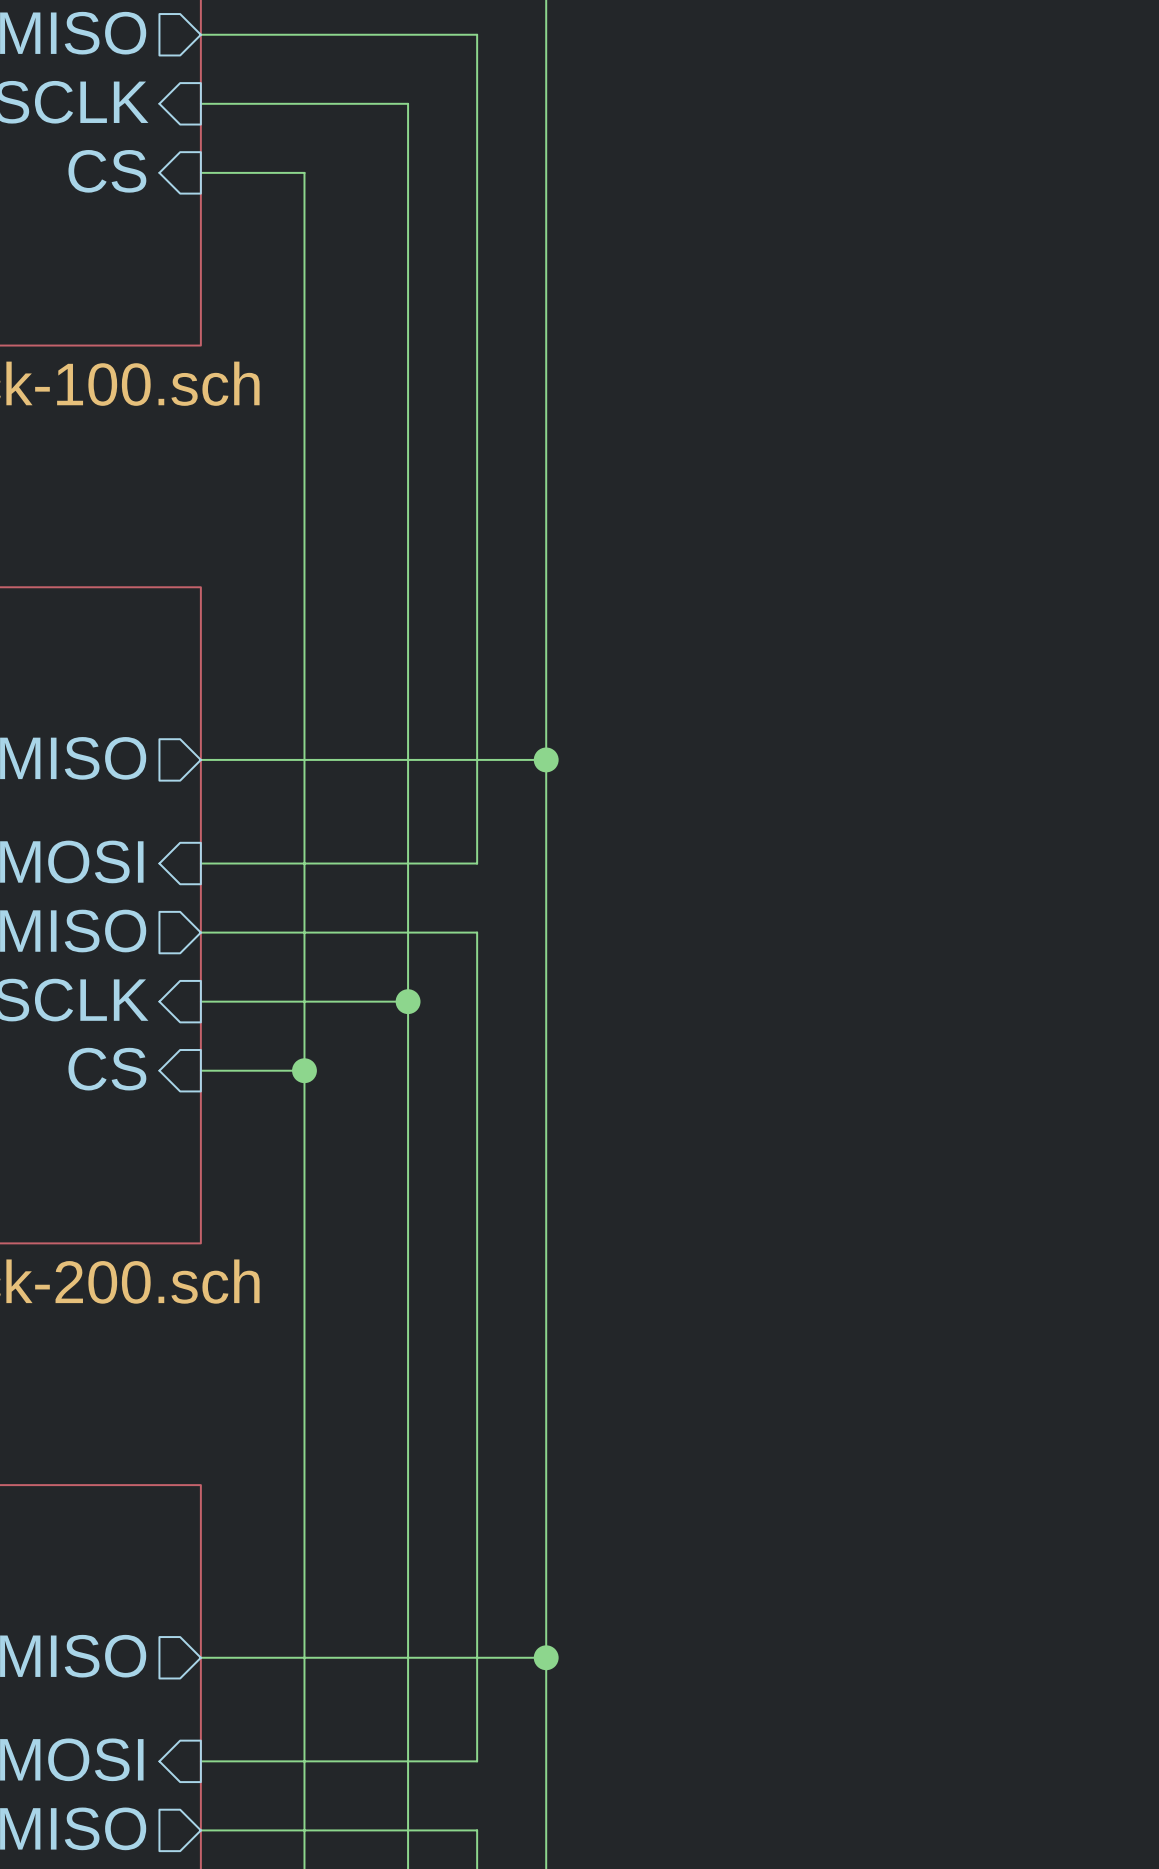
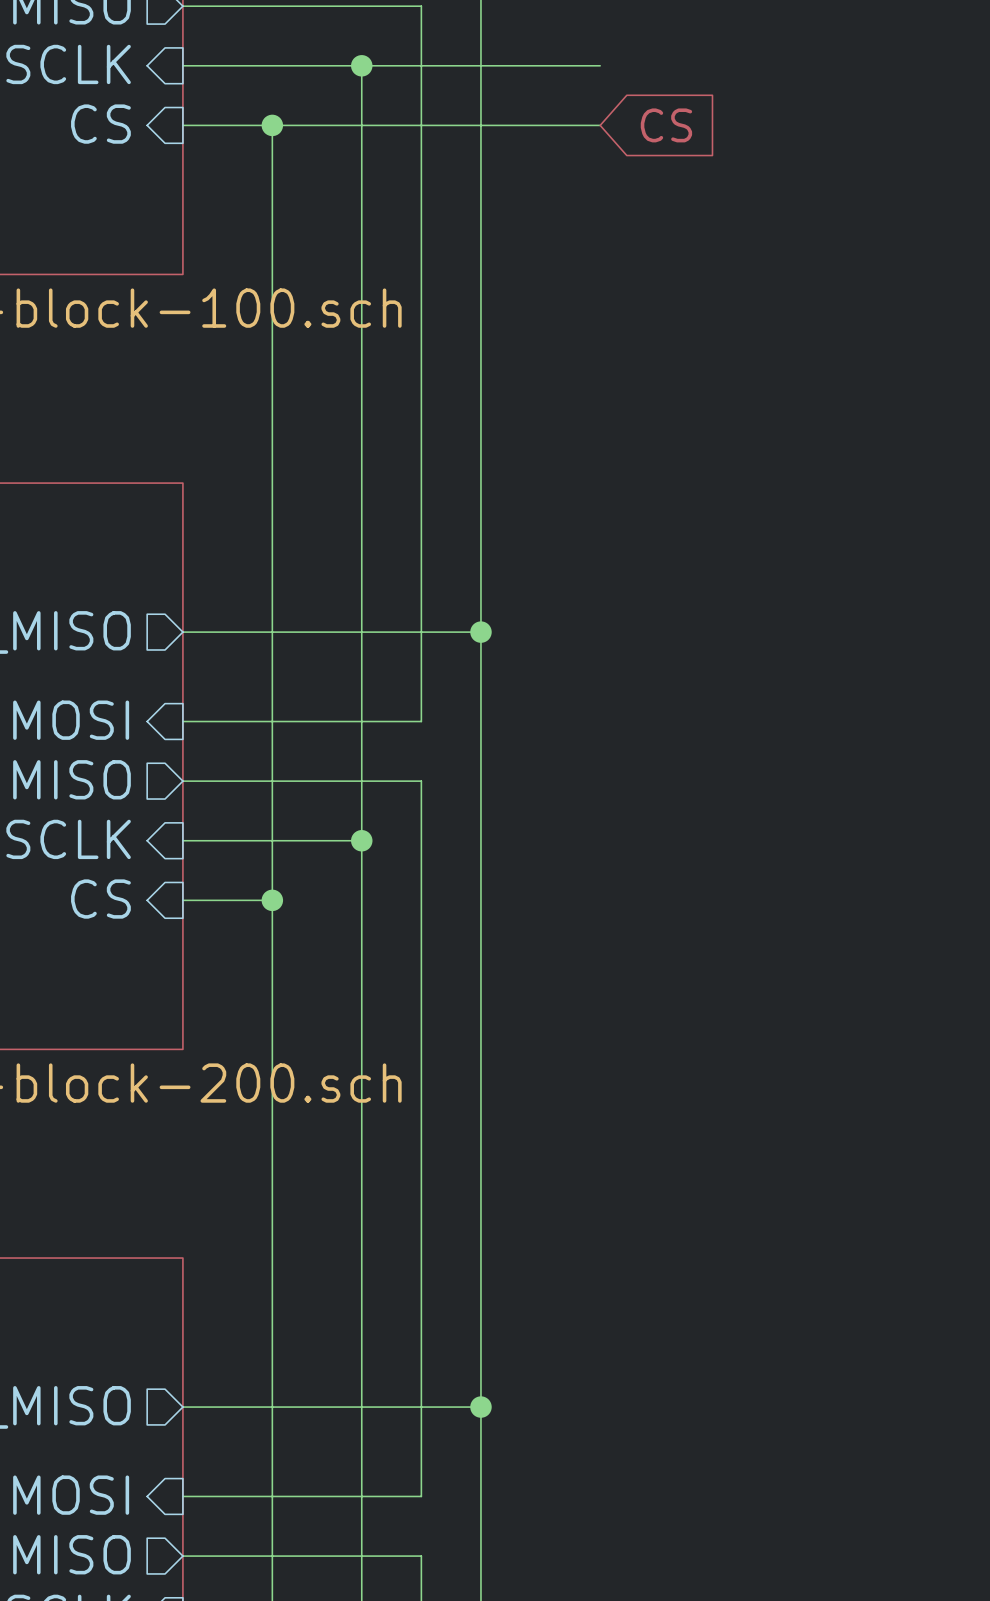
wire: none -> (361, 65) (600, 65)
junction: none -> (361, 65)
wire: none -> (272, 125) (600, 125)
junction: none -> (272, 125)
global label: none -> CS (666, 125)

